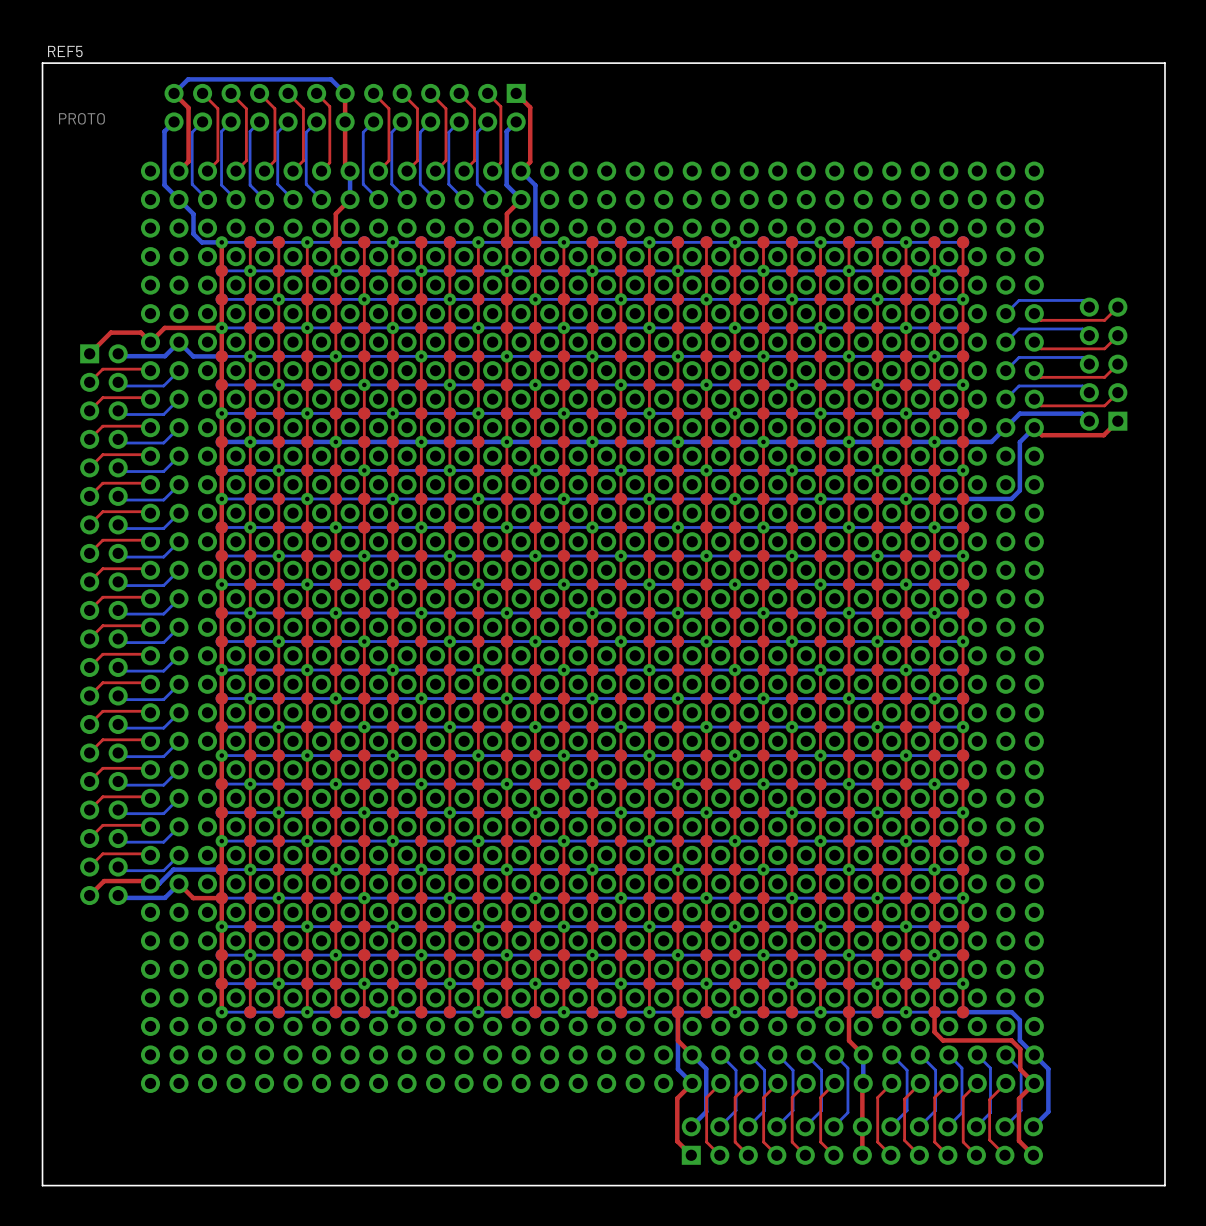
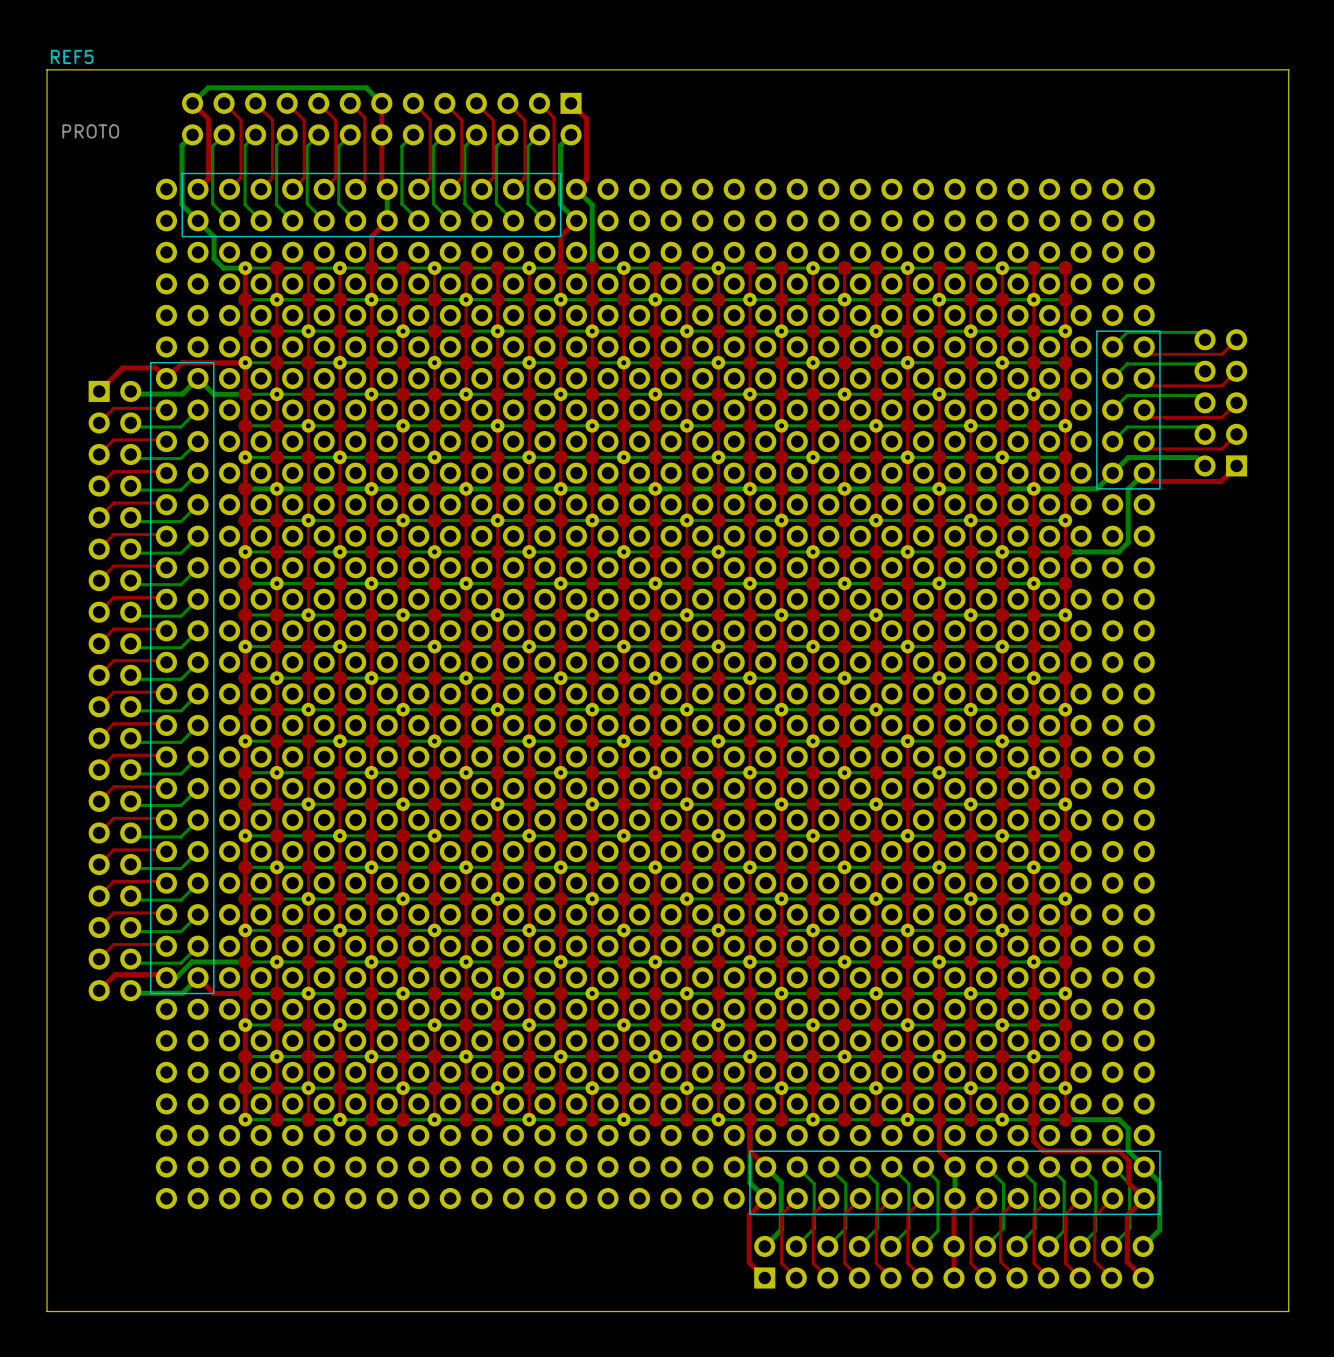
REF5 footprint: [140, 161, 1044, 1093] -> [149, 172, 1161, 1216]

